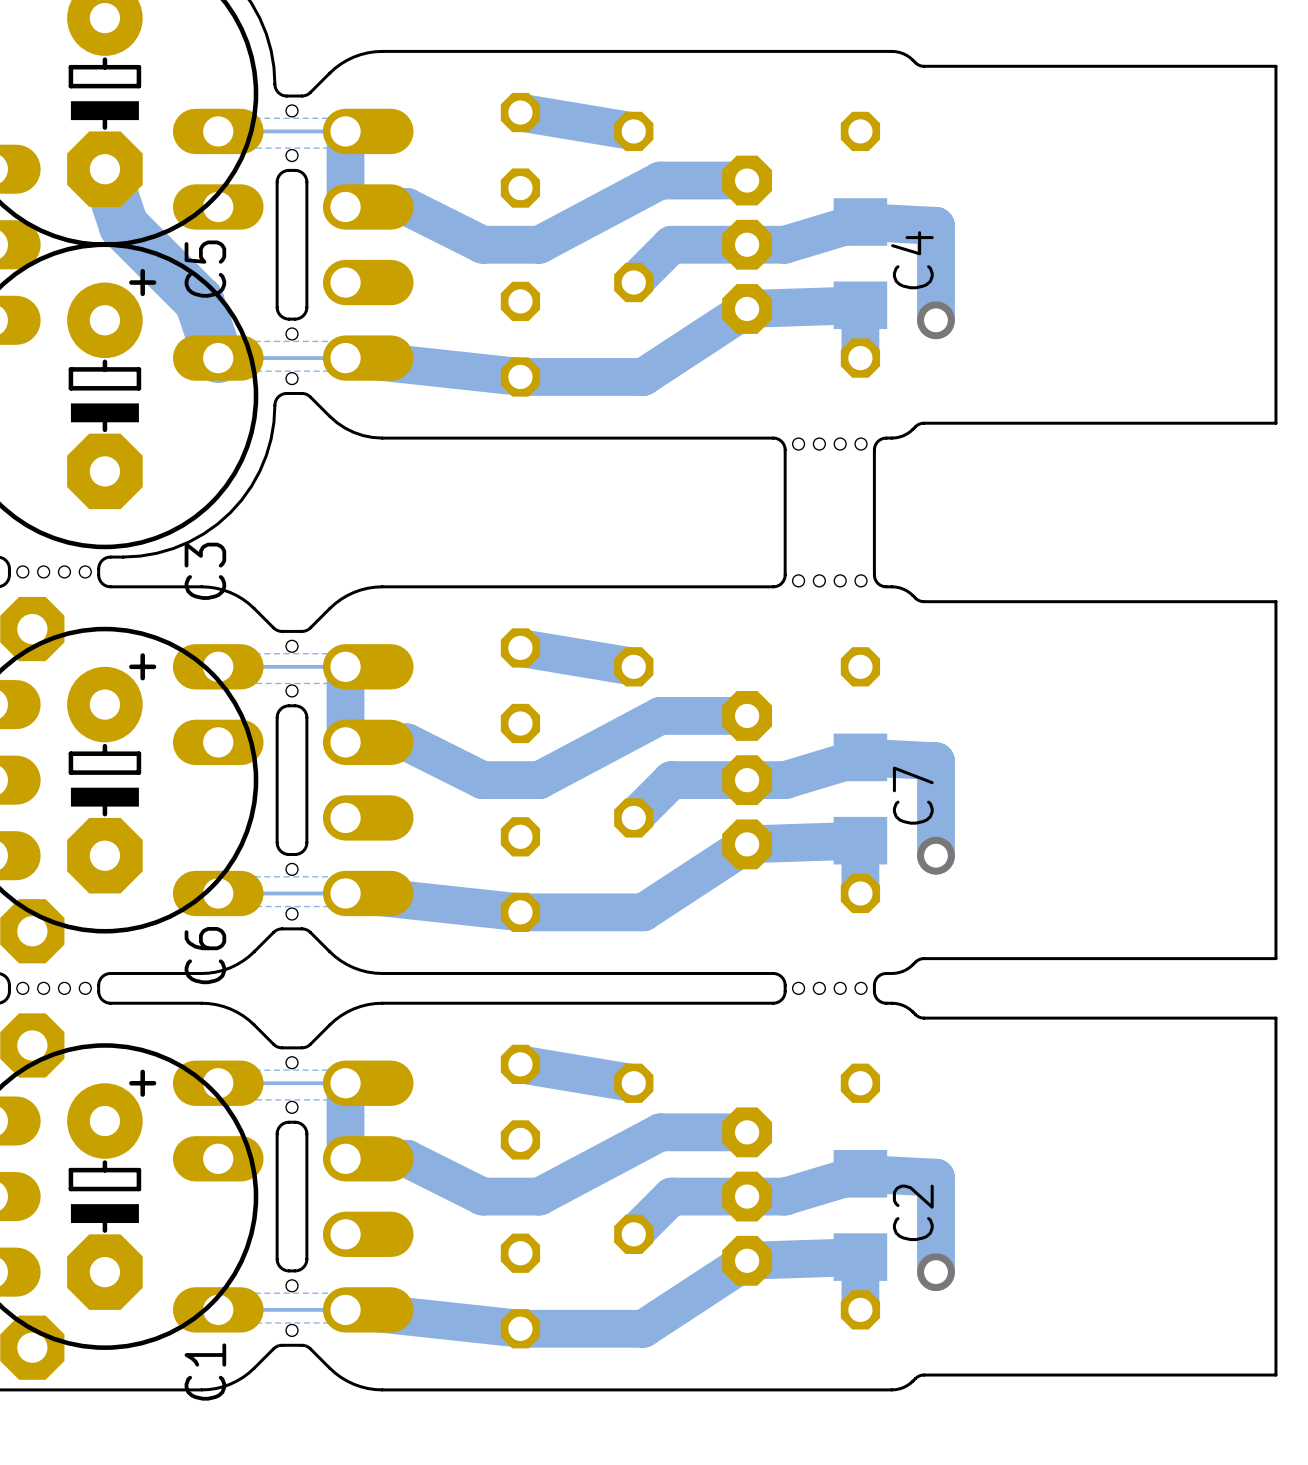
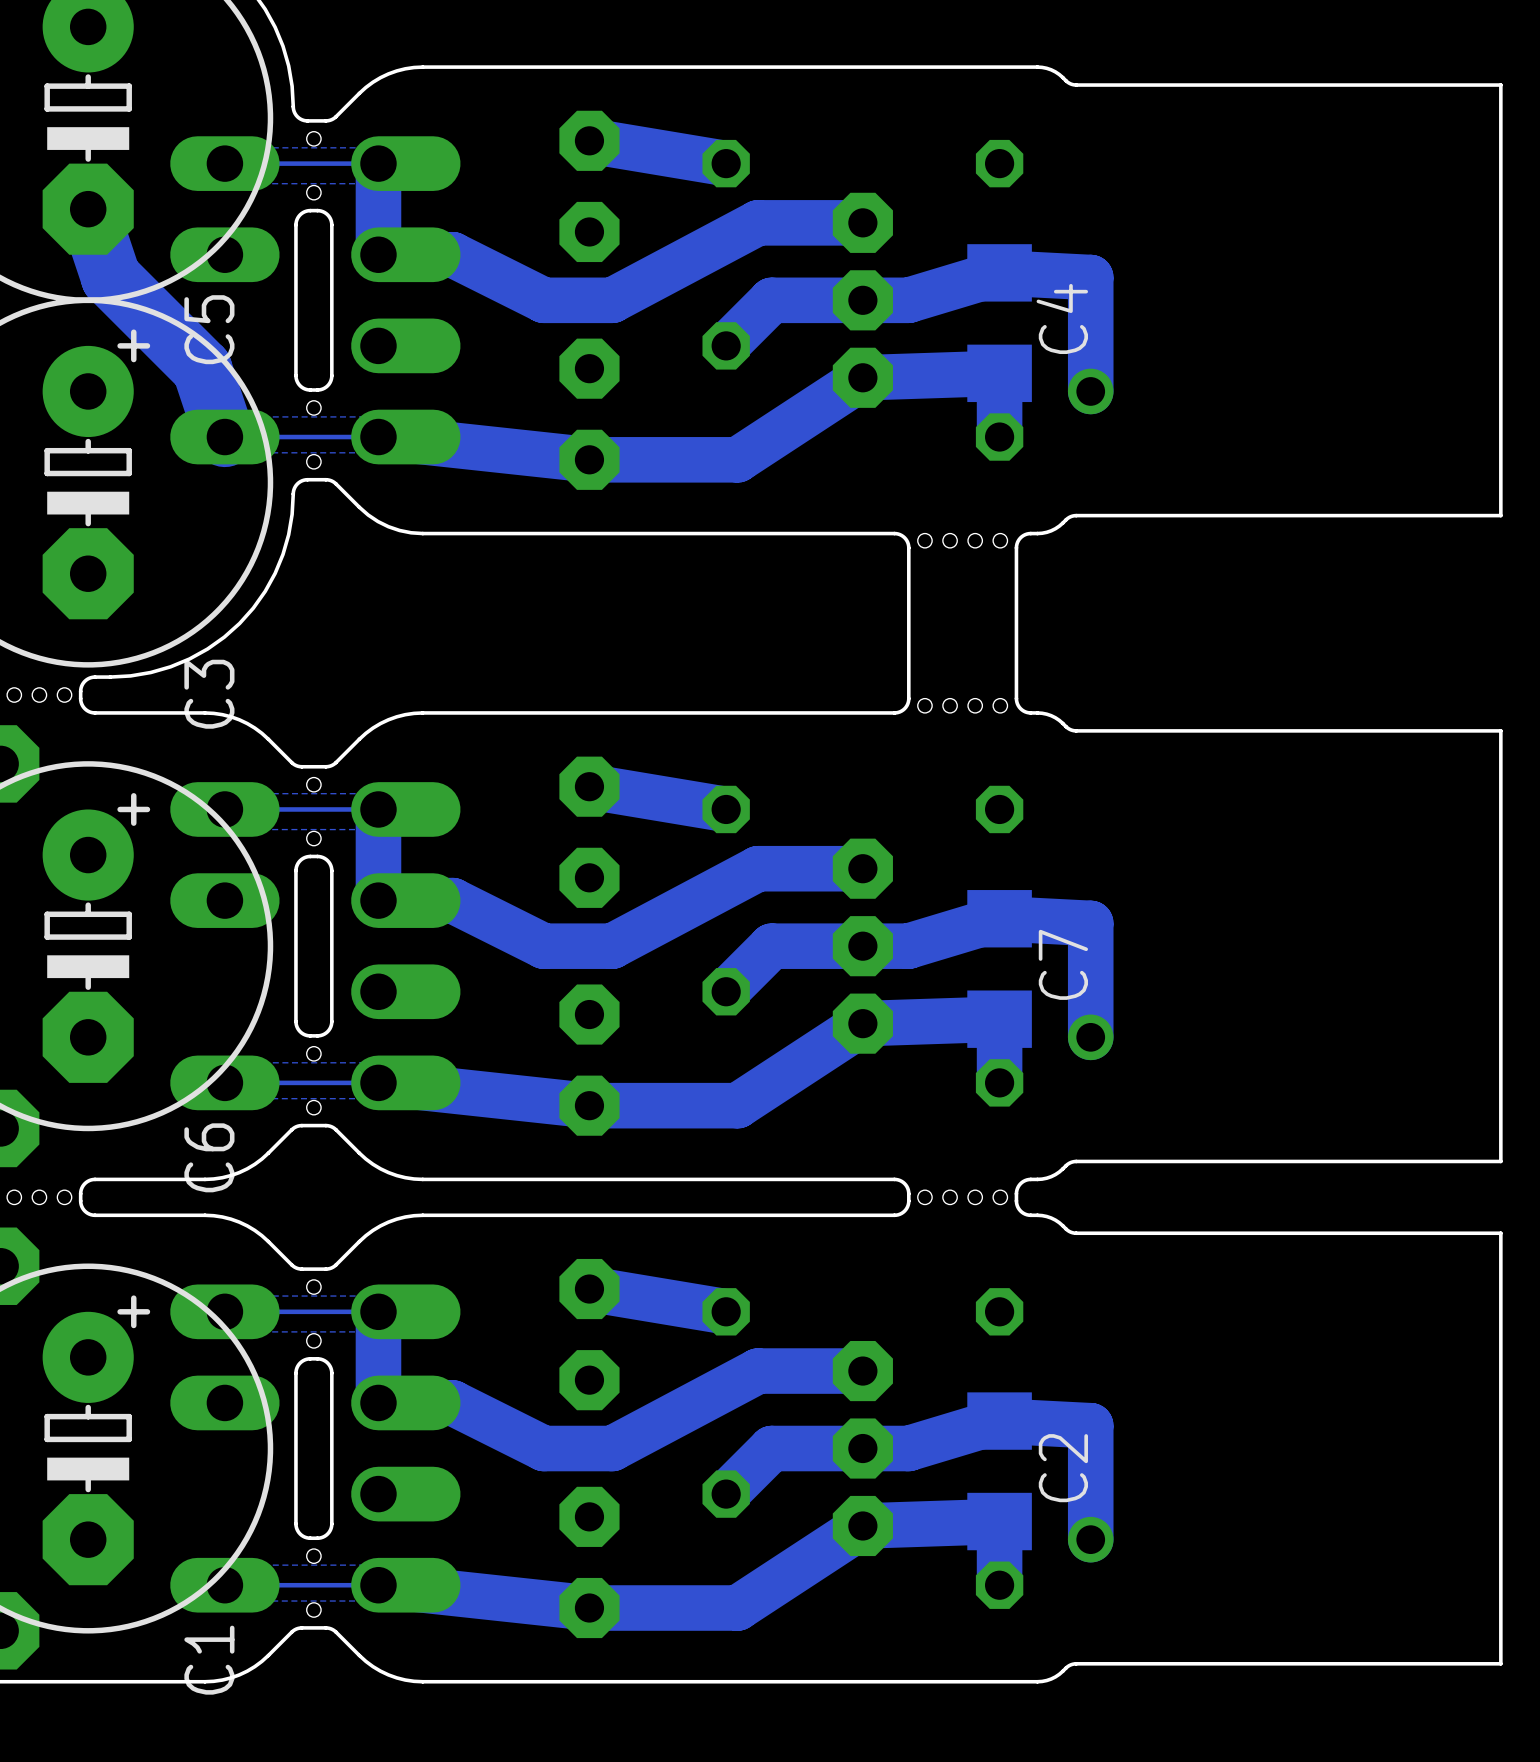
part footprint: [500, 92, 541, 208] -> [559, 110, 620, 263]
part footprint: [500, 281, 541, 397] -> [559, 338, 620, 490]
part footprint: [500, 628, 541, 744] -> [559, 756, 620, 908]
part footprint: [500, 817, 541, 933] -> [559, 984, 620, 1136]
part footprint: [500, 1044, 541, 1160] -> [559, 1258, 620, 1411]
part footprint: [500, 1233, 541, 1349] -> [559, 1486, 620, 1639]

